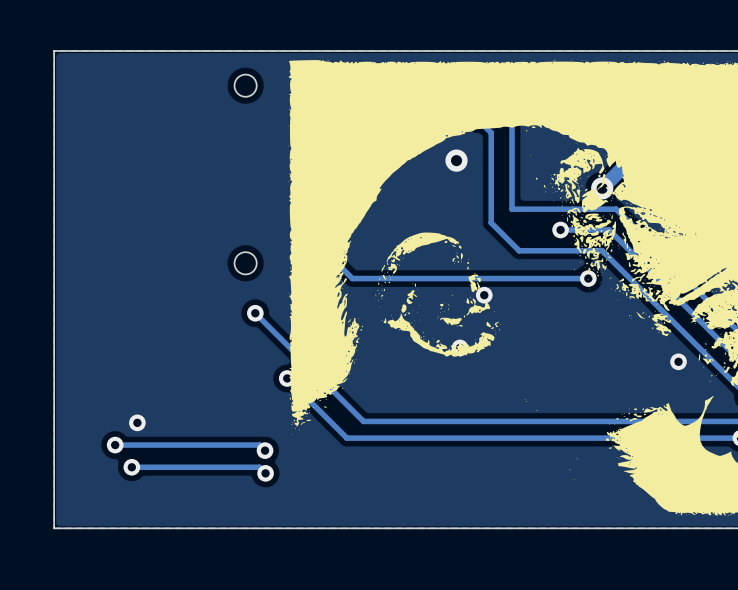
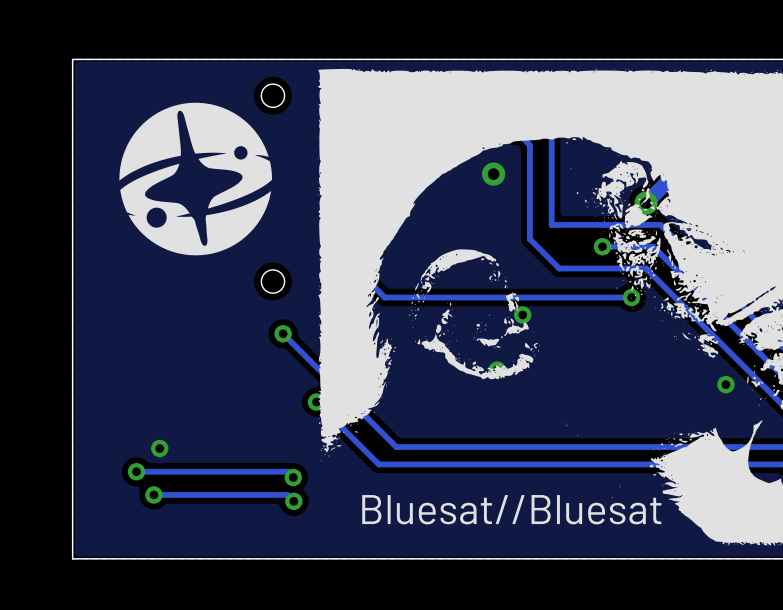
drawing: none -> [119, 102, 273, 256]
text: none -> Bluesat//Bluesat (511, 509)

